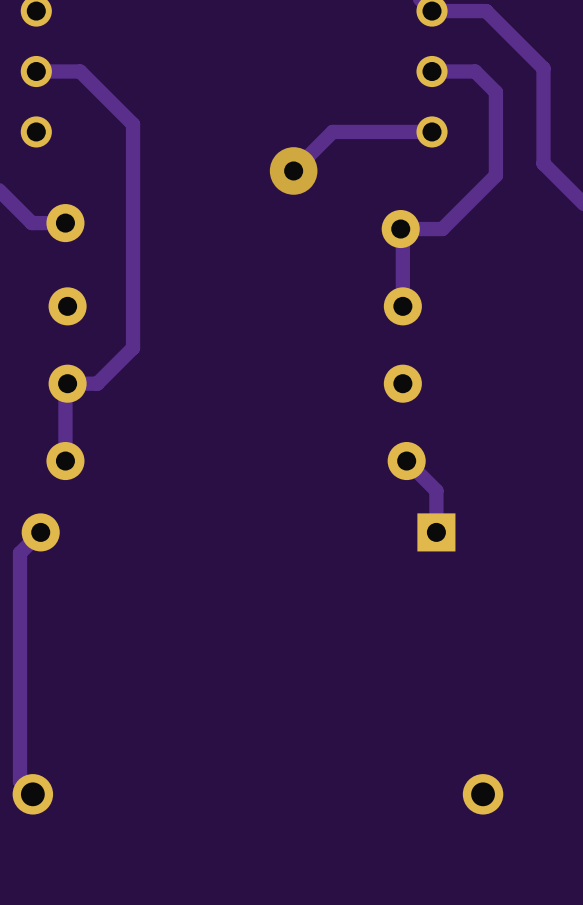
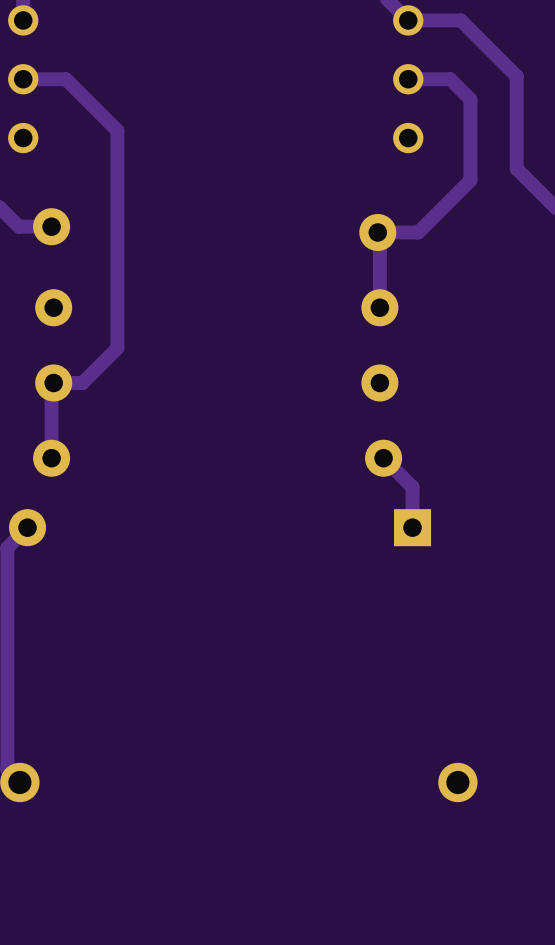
track: (432, 131) (332, 131) (293, 170) -> none
via: (293, 170) -> none

